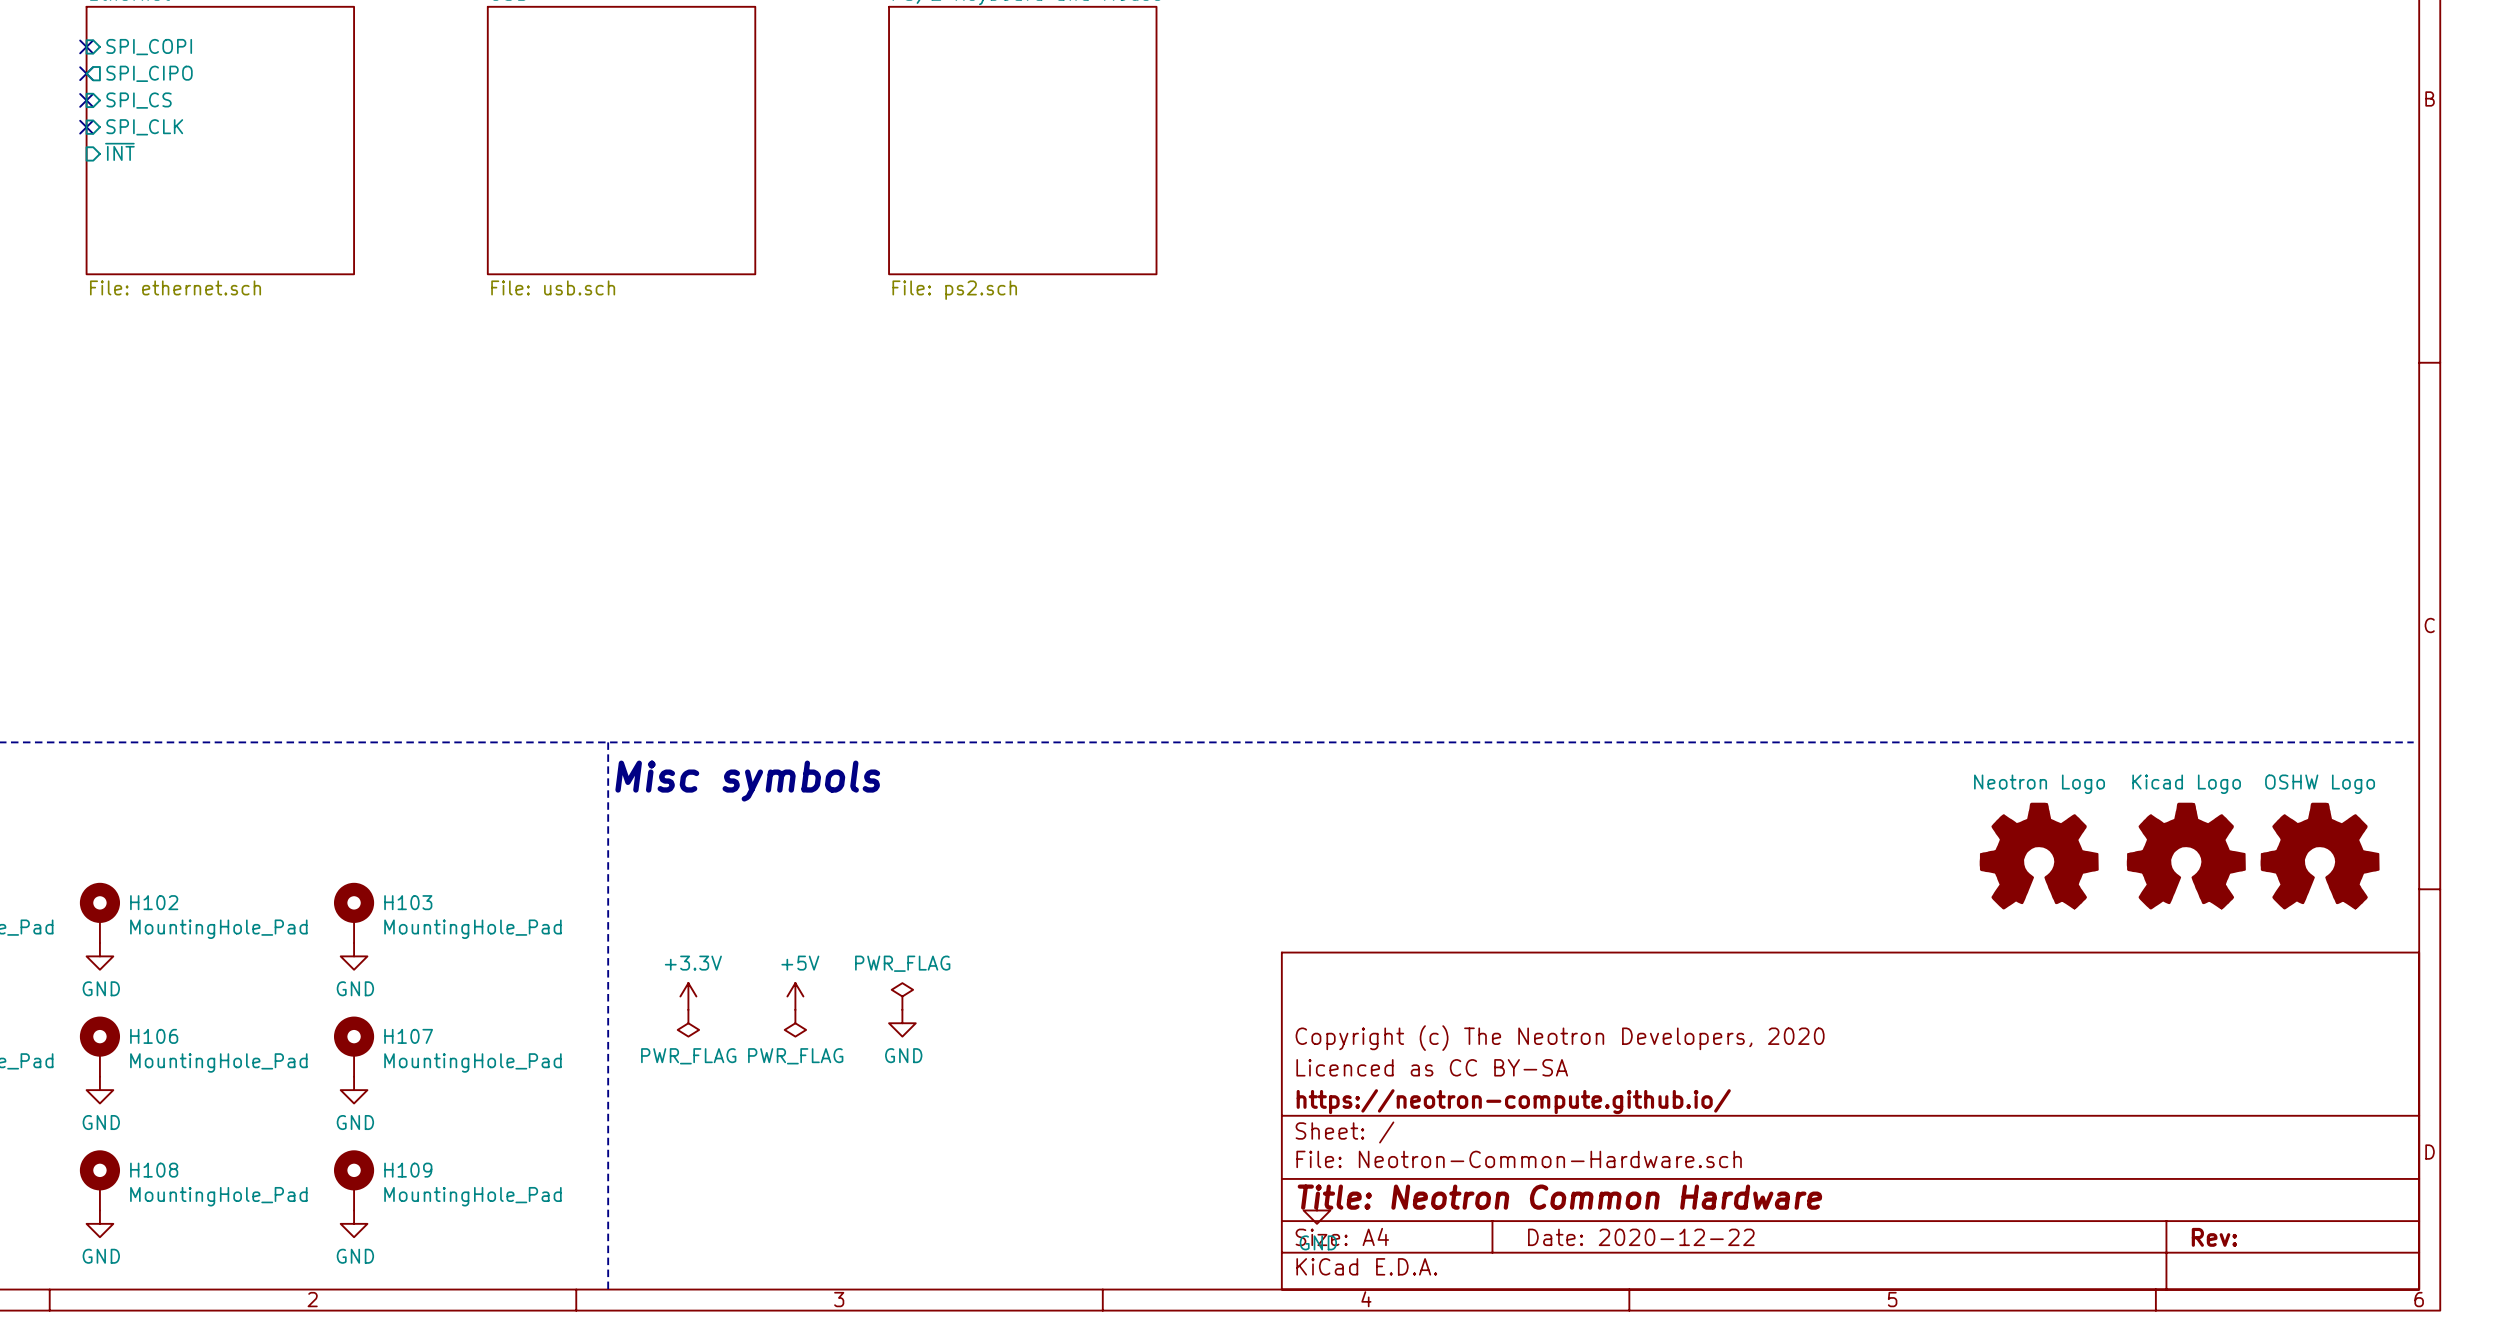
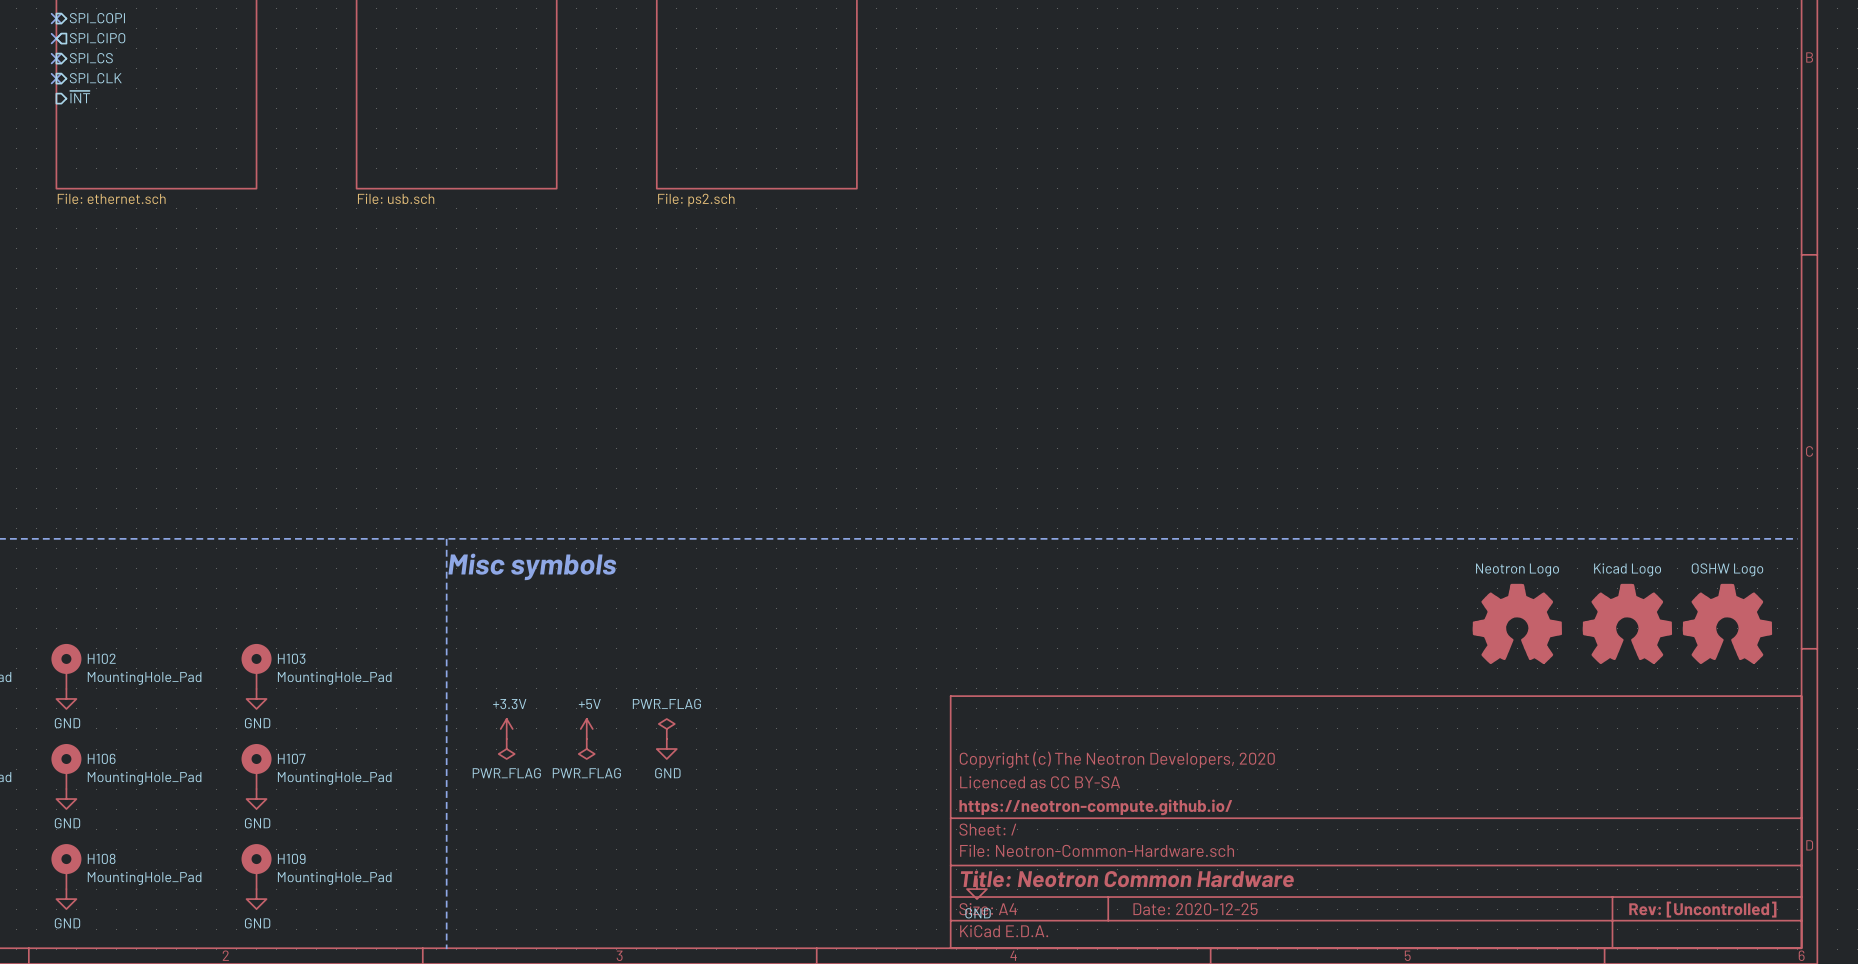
title block: Date: 2020-12-22 (1641, 1237) -> Date: 2020-12-25 (1195, 909)
title block: Rev: (2214, 1237) -> Rev: [Uncontrolled] (1702, 909)

